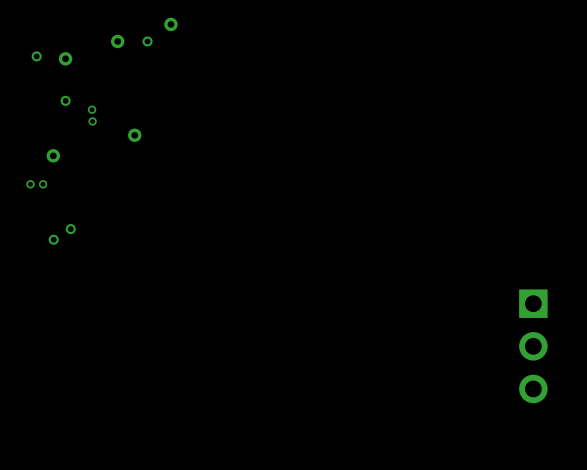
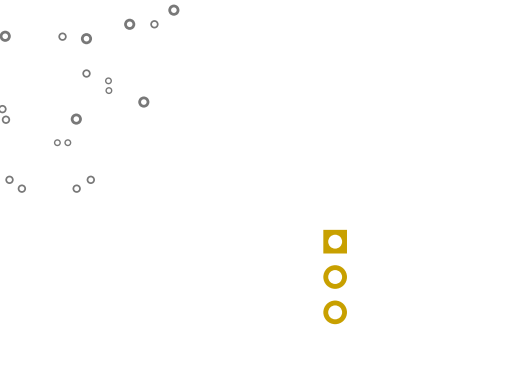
part position: (533, 346) -> (335, 277)

